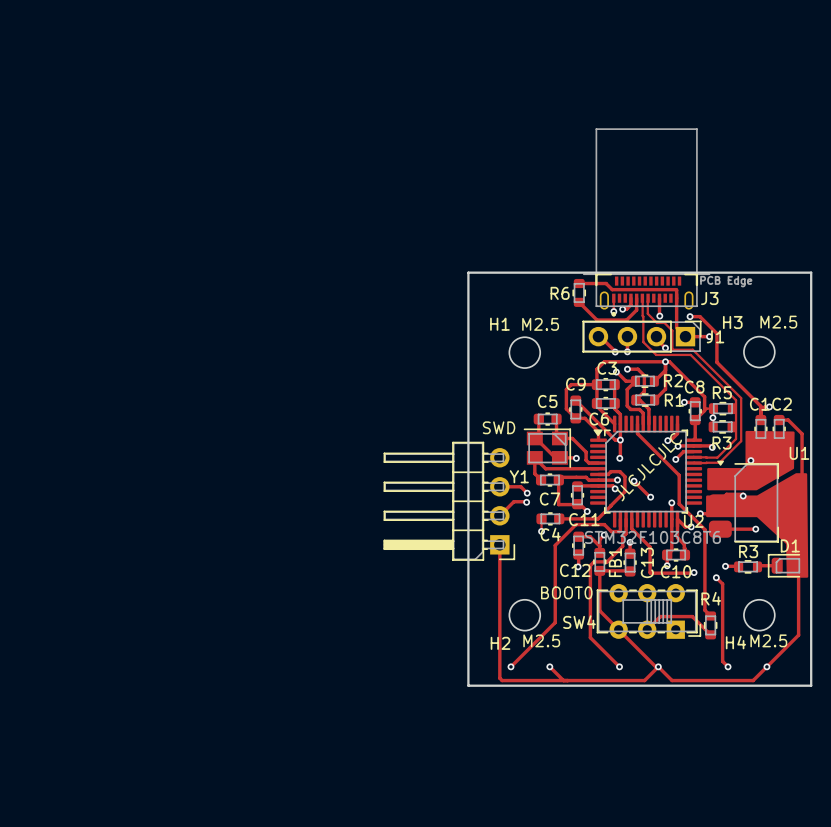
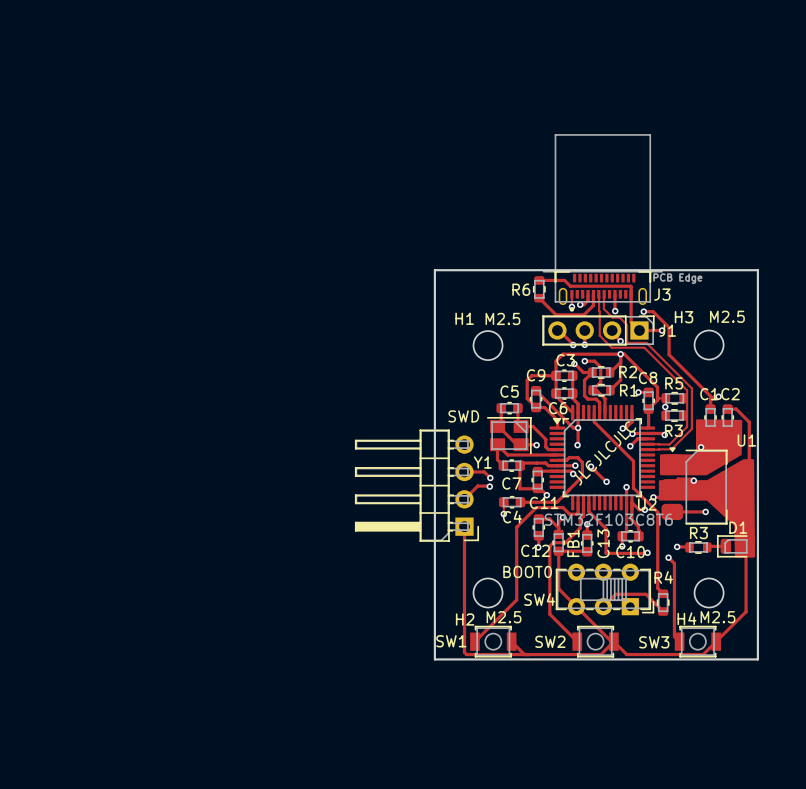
via: (510, 666) -> none
SW1: none -> (493, 641)
via: (549, 666) -> none
via: (619, 666) -> none
SW2: none -> (595, 641)
via: (658, 666) -> none
via: (728, 666) -> none
SW3: none -> (697, 641)
via: (766, 666) -> none

